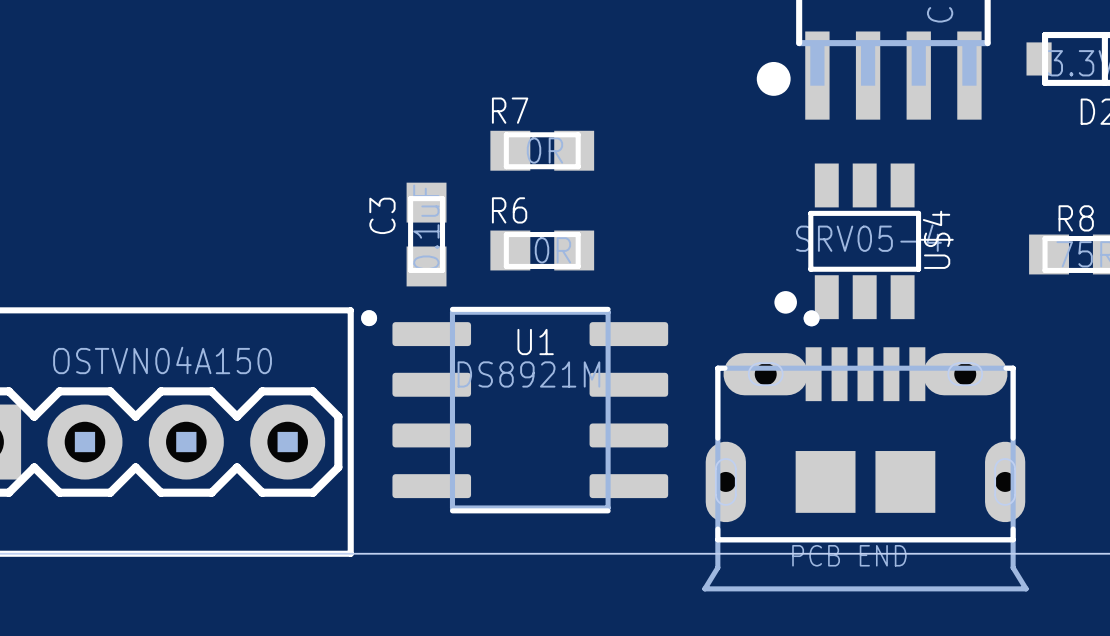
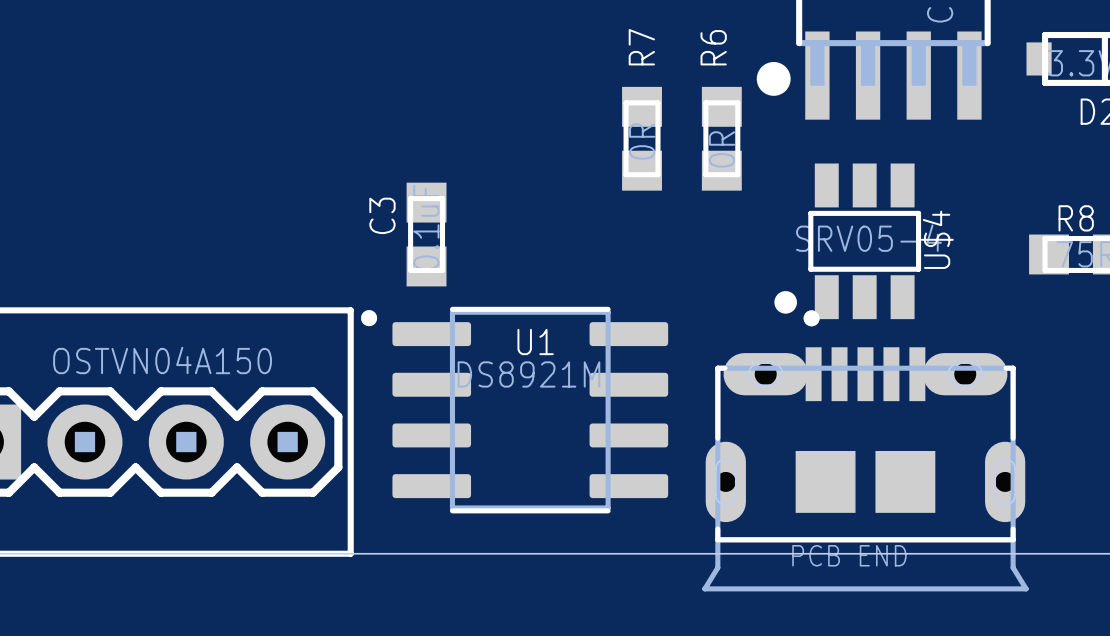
R7 rotation: 0° (542, 150) -> 90° clockwise (642, 138)
R7 position: (542, 150) -> (642, 138)
R6 rotation: 0° (542, 250) -> 90° clockwise (721, 138)
R6 position: (542, 250) -> (721, 138)

